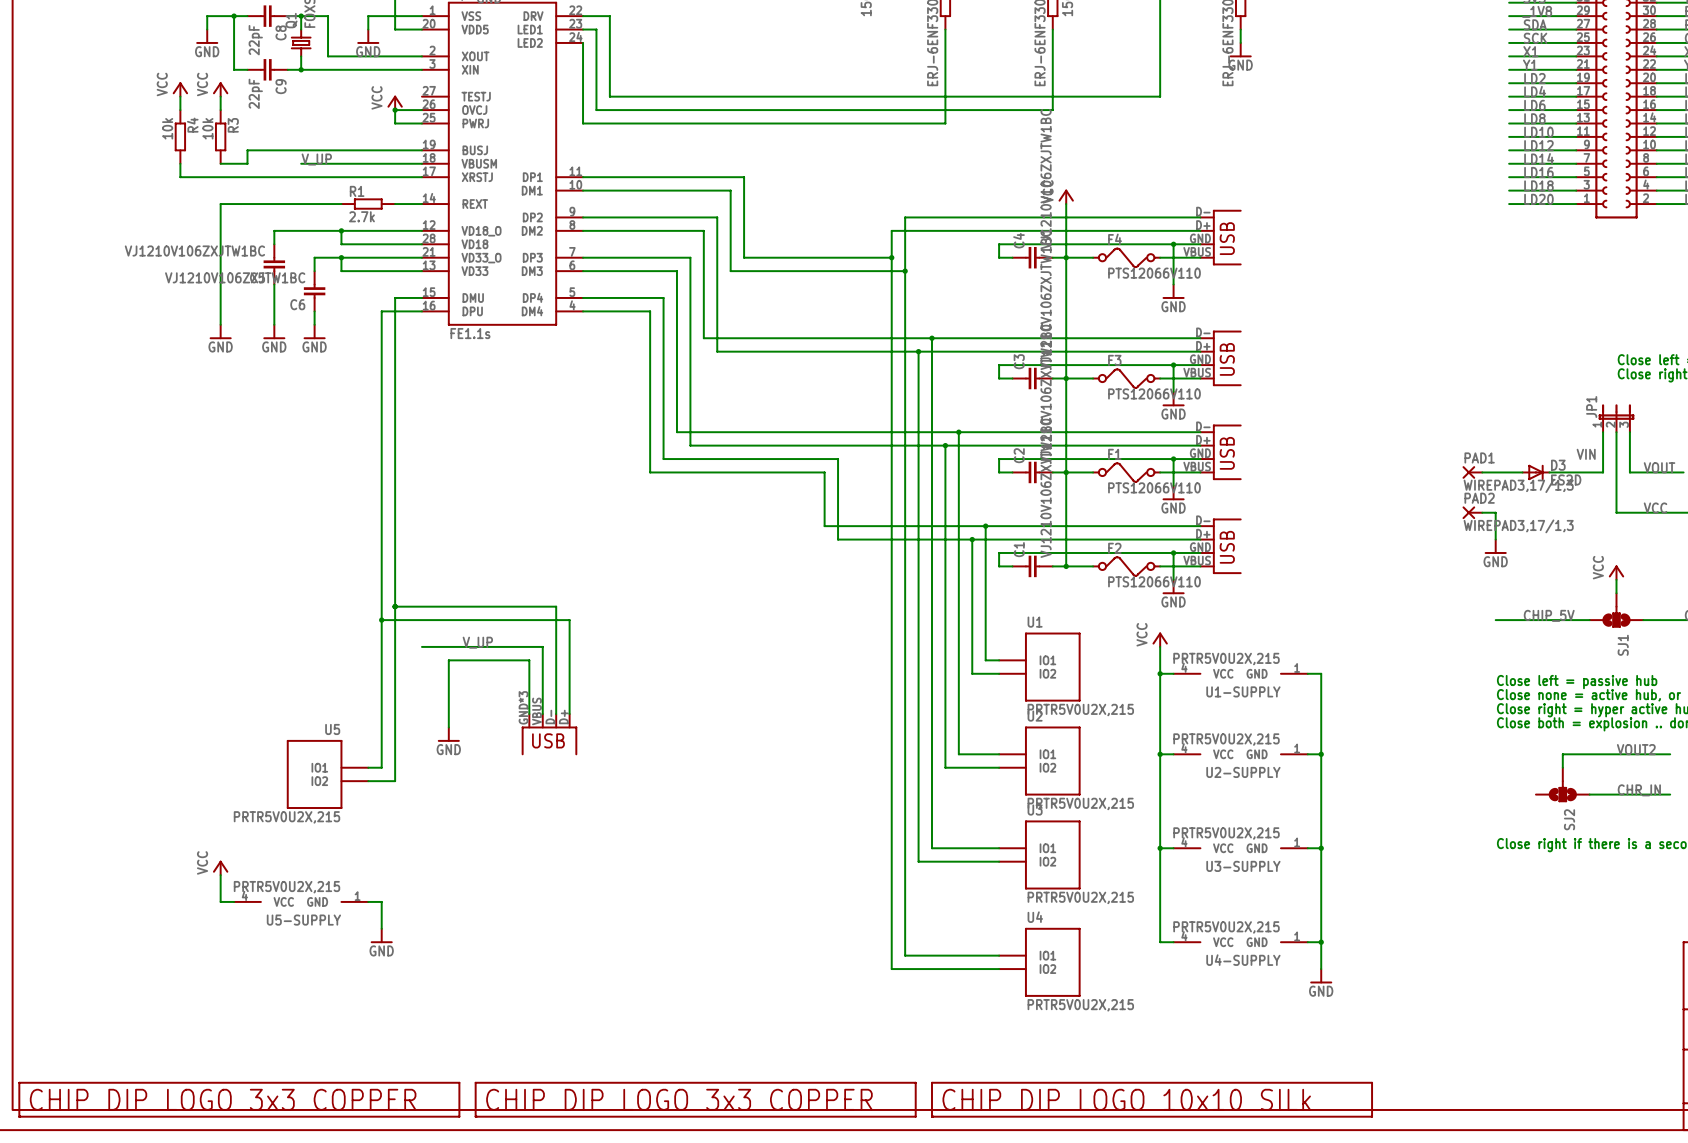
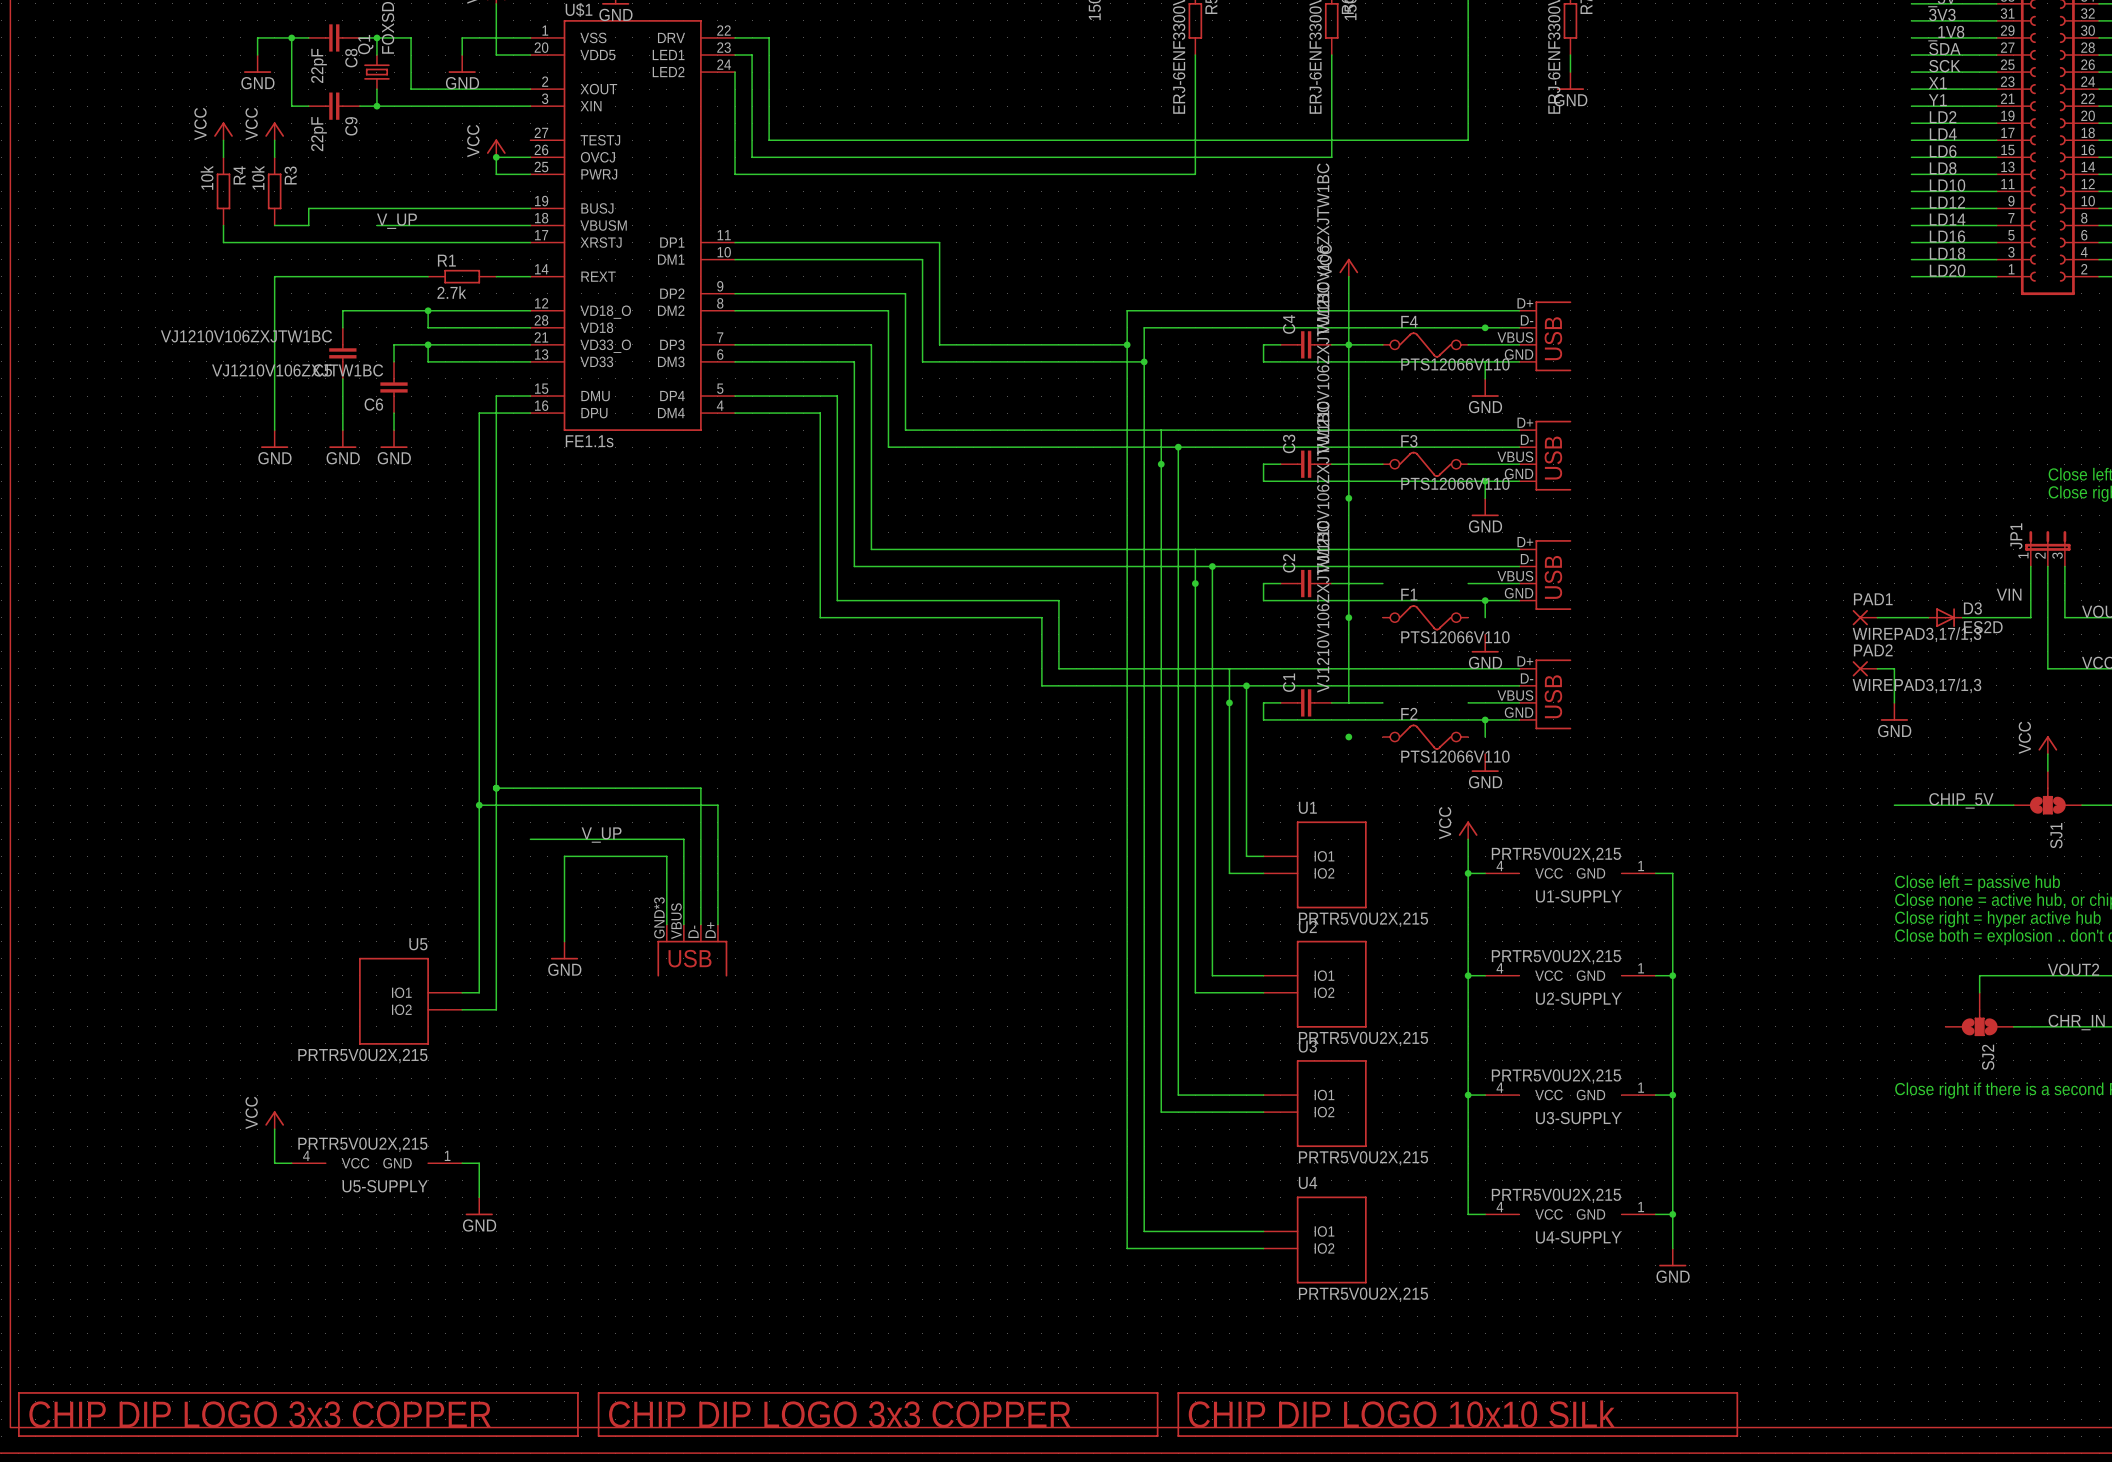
wire: (1200, 217) (905, 217) (905, 244) -> none
part: (1220, 237) -> none
wire: (999, 244) (999, 257) -> (1263, 327) (1144, 327)
wire: (1173, 244) (1173, 271) -> none
part: none -> (1545, 336)
wire: none -> (1263, 344) (1263, 361) (1519, 361)
wire: (717, 324) (717, 351) (999, 351) -> (905, 430) (1519, 430)
wire: none -> (1161, 430) (1161, 464)
part: none -> (1545, 455)
wire: (1093, 351) (1160, 351) -> none
part: (1220, 358) -> none
wire: (999, 365) (999, 378) (1012, 378) -> (1263, 481) (1263, 464)
C3 position: (1032, 378) -> (1306, 464)
wire: (1052, 378) (1093, 378) -> none
F3 position: (1126, 378) -> (1425, 464)
wire: (1160, 378) (1200, 378) -> none
power symbol position: GND (1173, 398) -> GND (1485, 507)
wire: (690, 418) (690, 445) (999, 445) -> (871, 549) (1519, 549)
wire: none -> (1195, 549) (1195, 583)
part: none -> (1545, 575)
wire: (1093, 445) (1160, 445) -> none
part: (1220, 452) -> none
wire: (999, 459) (999, 472) (1012, 472) -> (1263, 600) (1263, 583)
C2 position: (1032, 472) -> (1306, 583)
wire: (1052, 472) (1093, 472) -> none
wire: (1160, 472) (1200, 472) -> none
wire: (1173, 472) (1173, 485) -> none
wire: (838, 512) (838, 539) (999, 539) -> (1058, 668) (1519, 668)
part: none -> (1545, 694)
wire: (1066, 539) (1066, 566) -> (1229, 668) (1229, 702)
wire: (1093, 539) (1160, 539) -> none
part: (1220, 546) -> none
wire: (999, 552) (999, 566) (1012, 566) -> (1263, 719) (1263, 702)
C1 position: (1032, 566) -> (1306, 702)
wire: (1052, 566) (1093, 566) -> none
wire: (1160, 566) (1200, 566) -> none
wire: (1173, 566) (1173, 579) -> none

